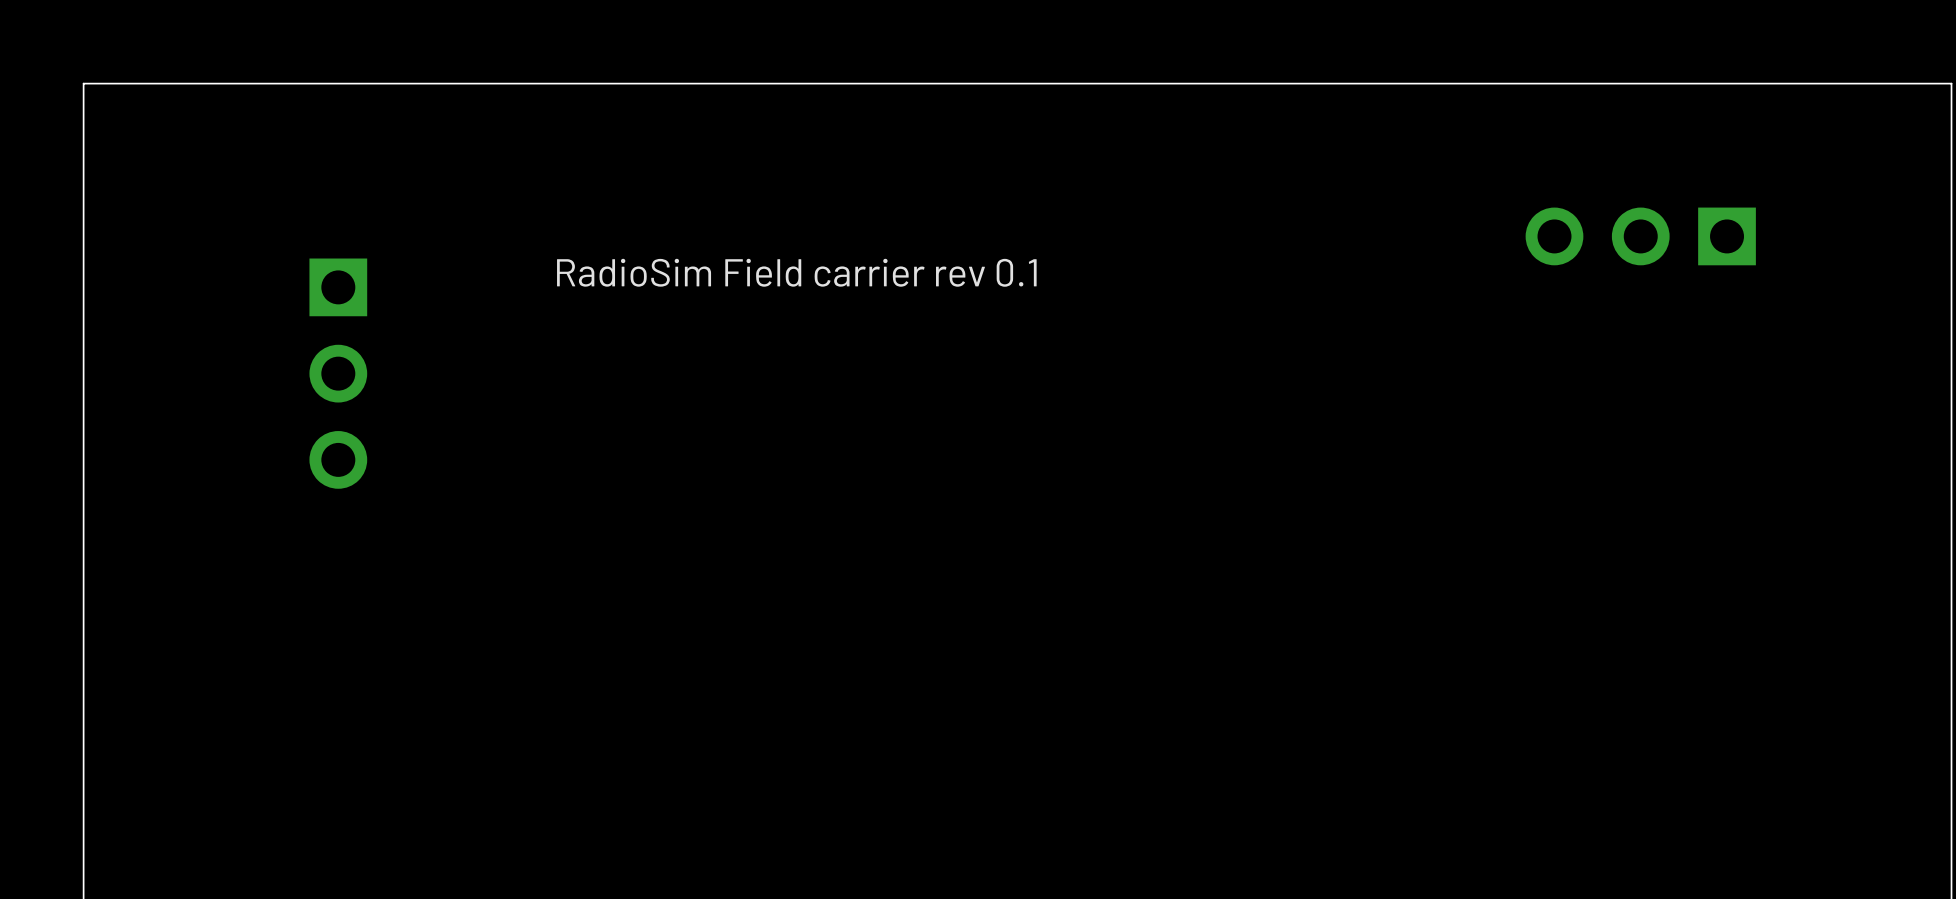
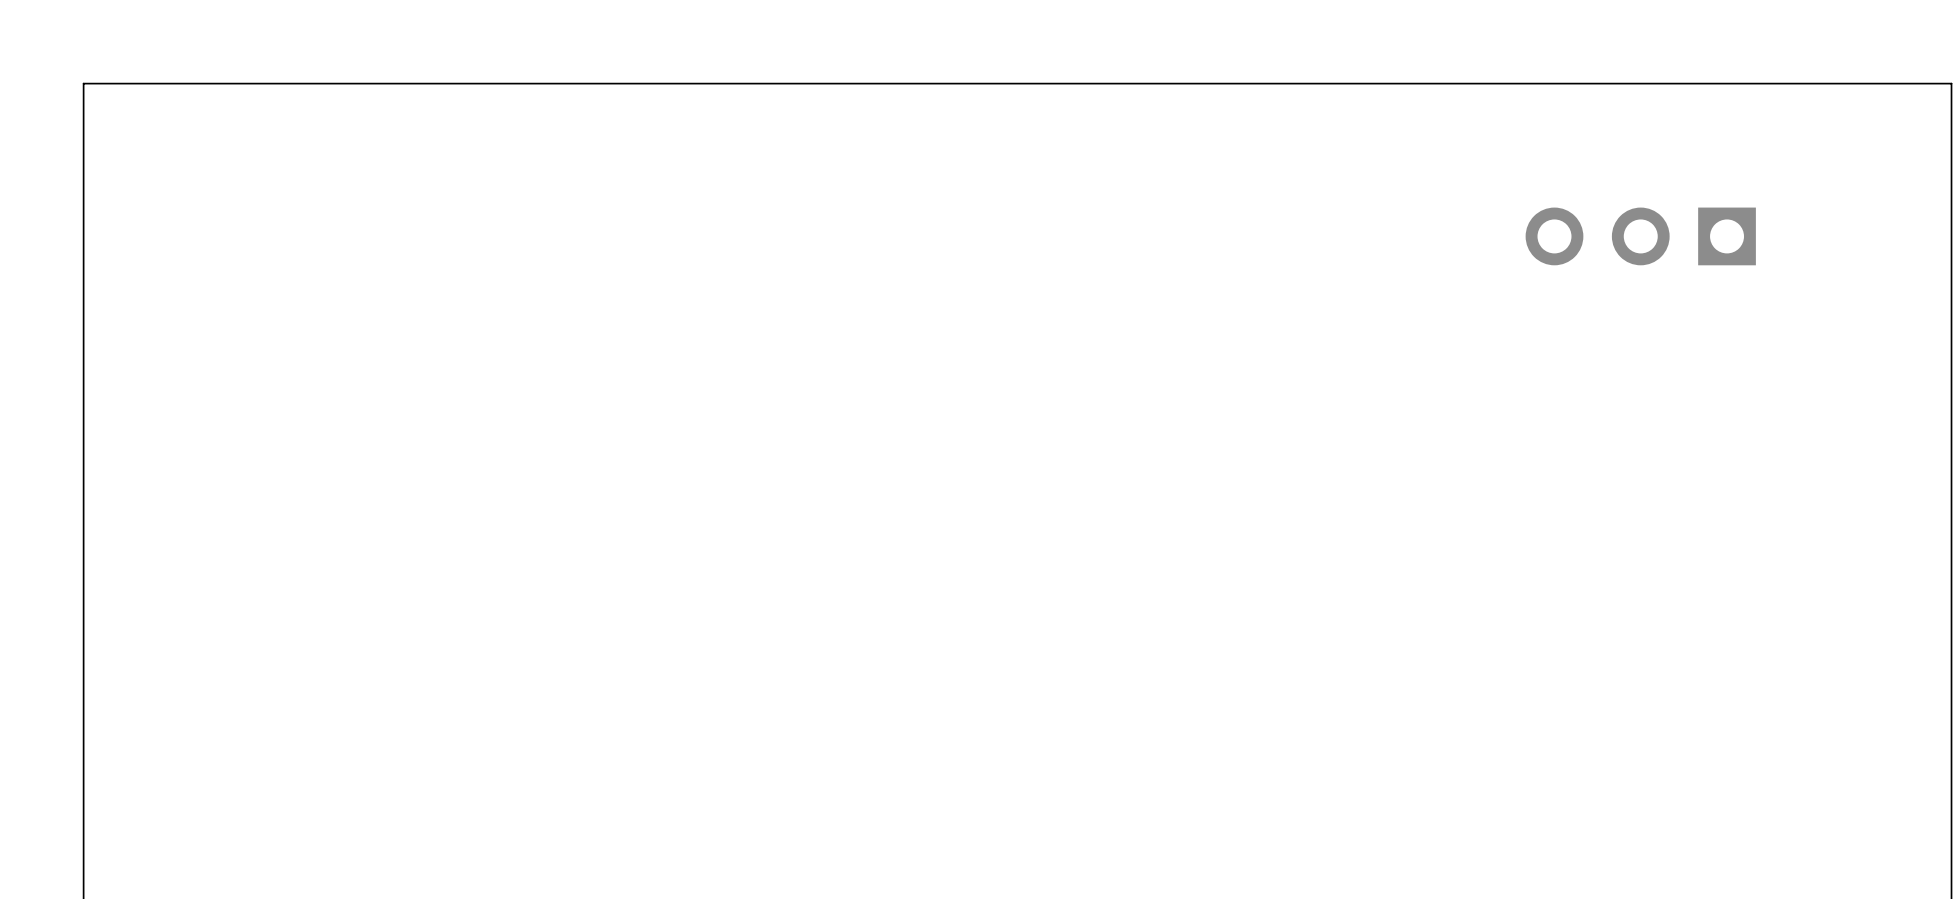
text: RadioSim Field carrier rev 0.1 (796, 272) -> none
part: (338, 373) -> none

